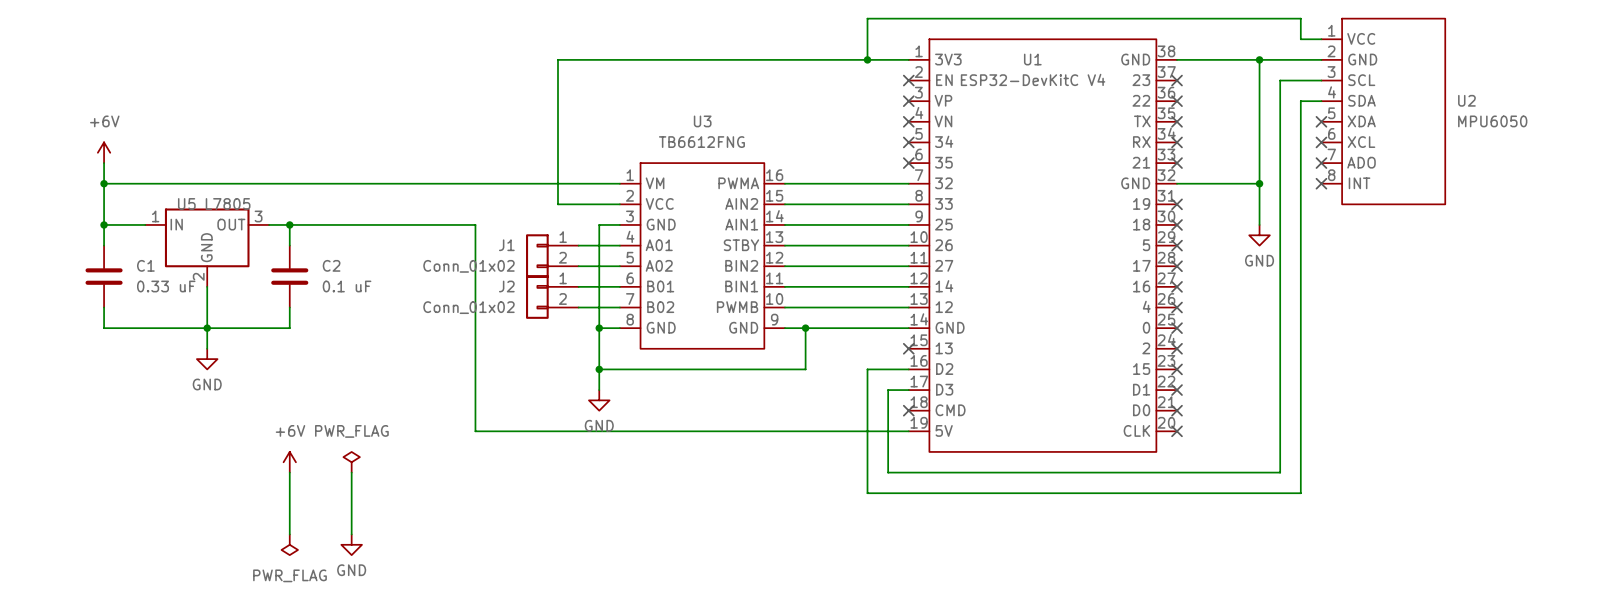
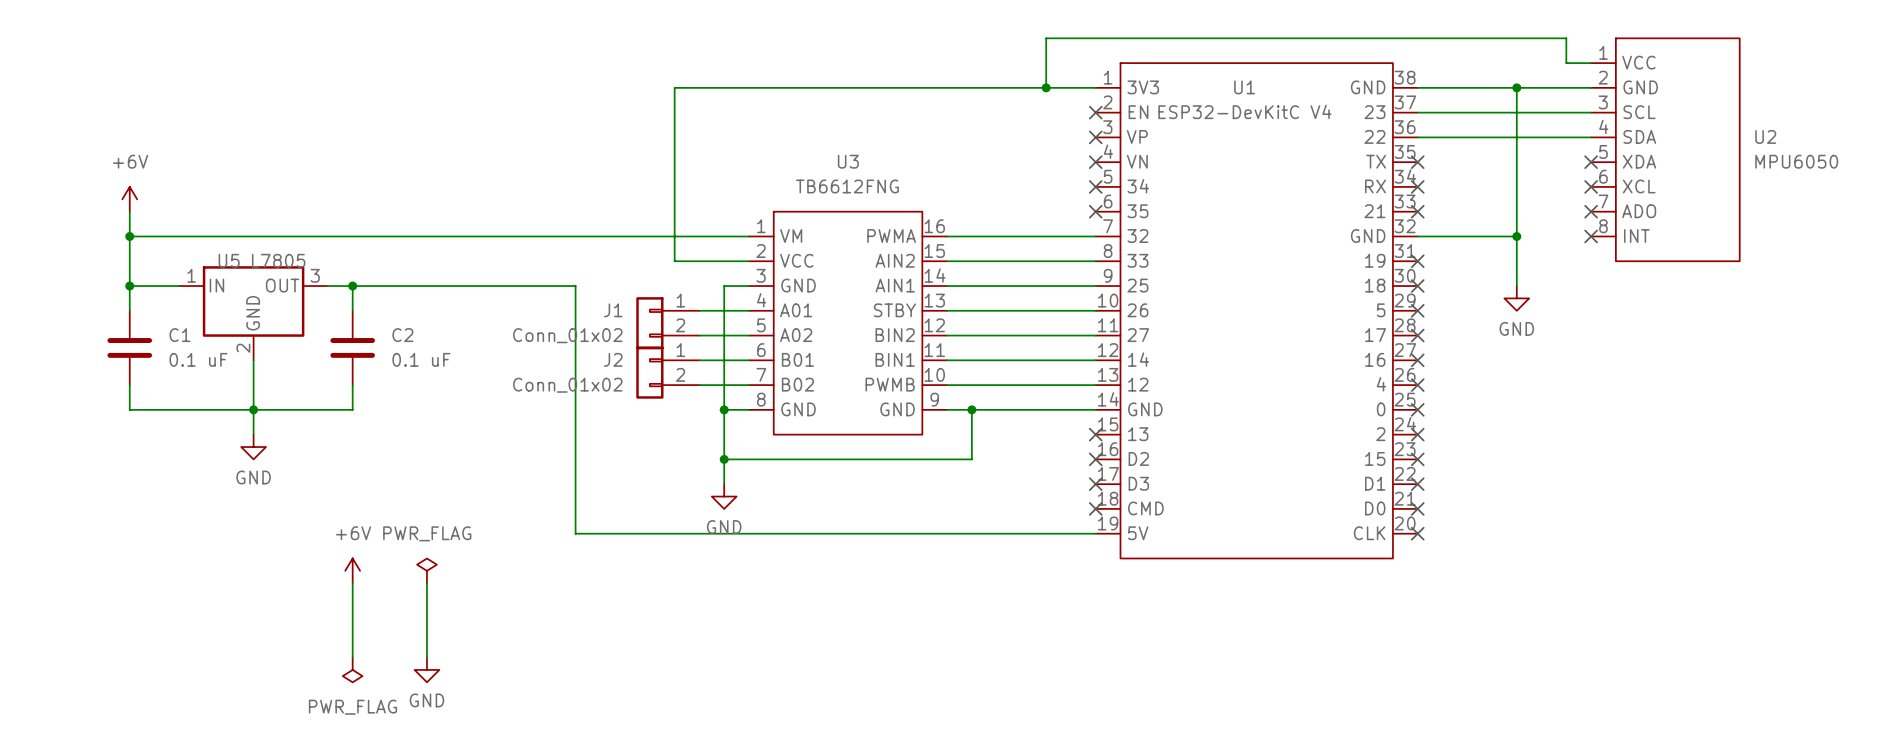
no-connect mark: (1177, 80) -> none
wire: (1280, 80) (1280, 472) (888, 472) (888, 390) (908, 390) -> (1541, 112) (1417, 112)
no-connect mark: (1177, 101) -> none
wire: (1300, 101) (1300, 493) (867, 493) (867, 369) (908, 369) -> (1566, 137) (1417, 137)
C1 value: 0.33 uF (166, 286) -> 0.1 uF (198, 359)
no-connect mark: none -> (1095, 459)
no-connect mark: none -> (1095, 484)

